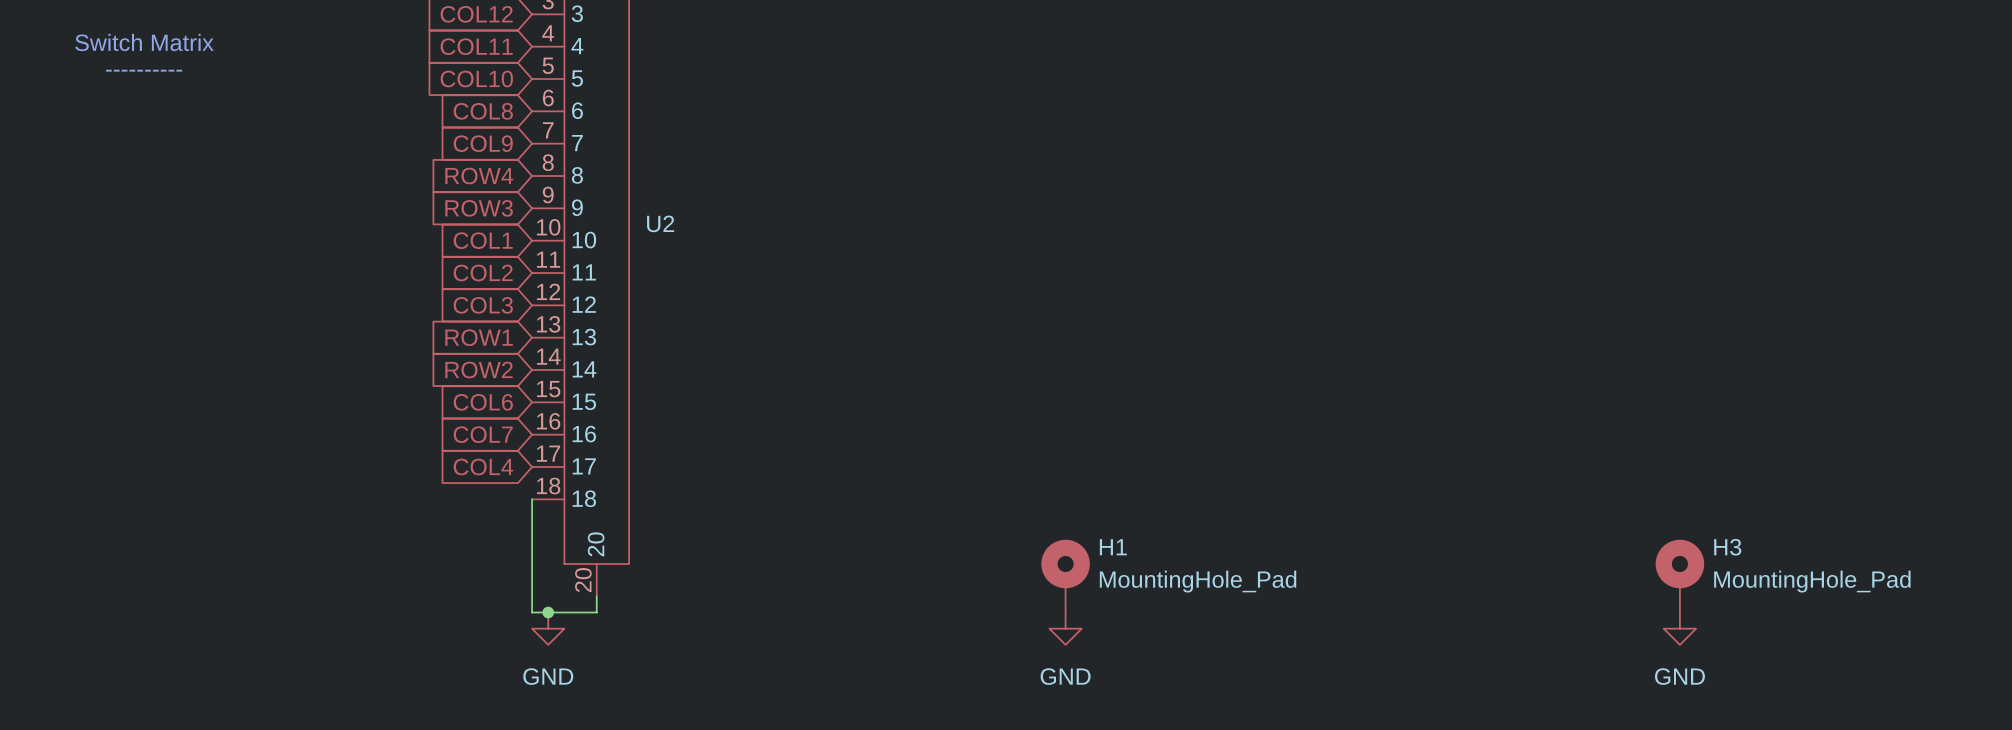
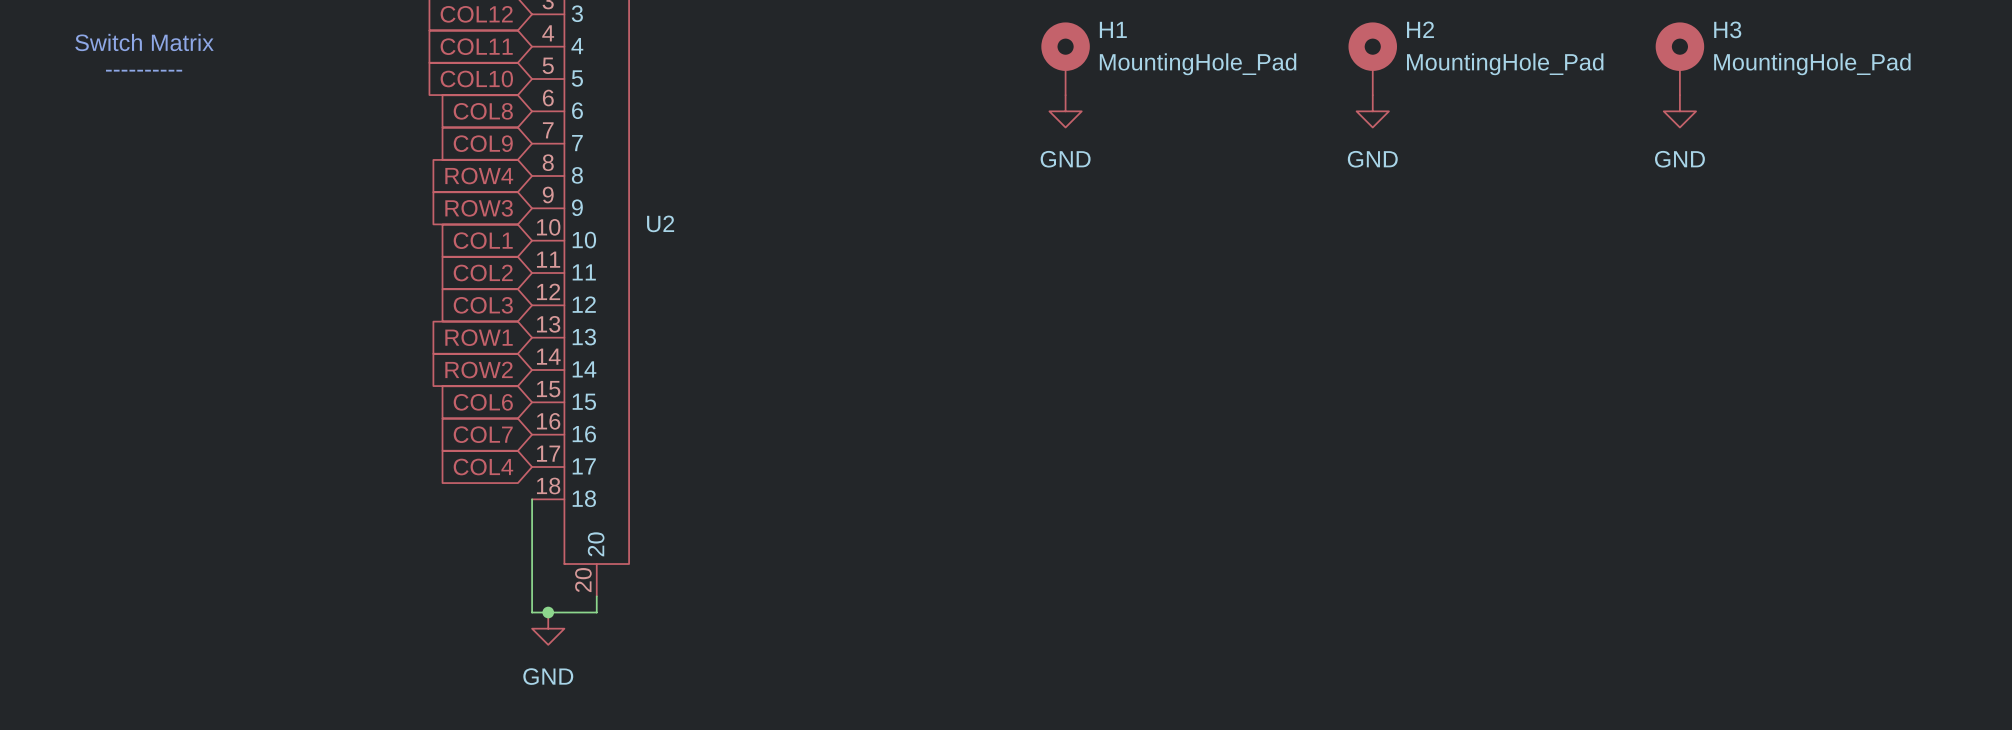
H2: none -> MountingHole_Pad (1372, 58)
power symbol: none -> GND (1065, 111)
power symbol: none -> GND (1372, 111)
power symbol: none -> GND (1679, 111)
H1 position: (1065, 576) -> (1065, 58)
H3 position: (1679, 576) -> (1679, 58)
power symbol: GND (1065, 628) -> none
power symbol: GND (1679, 628) -> none

